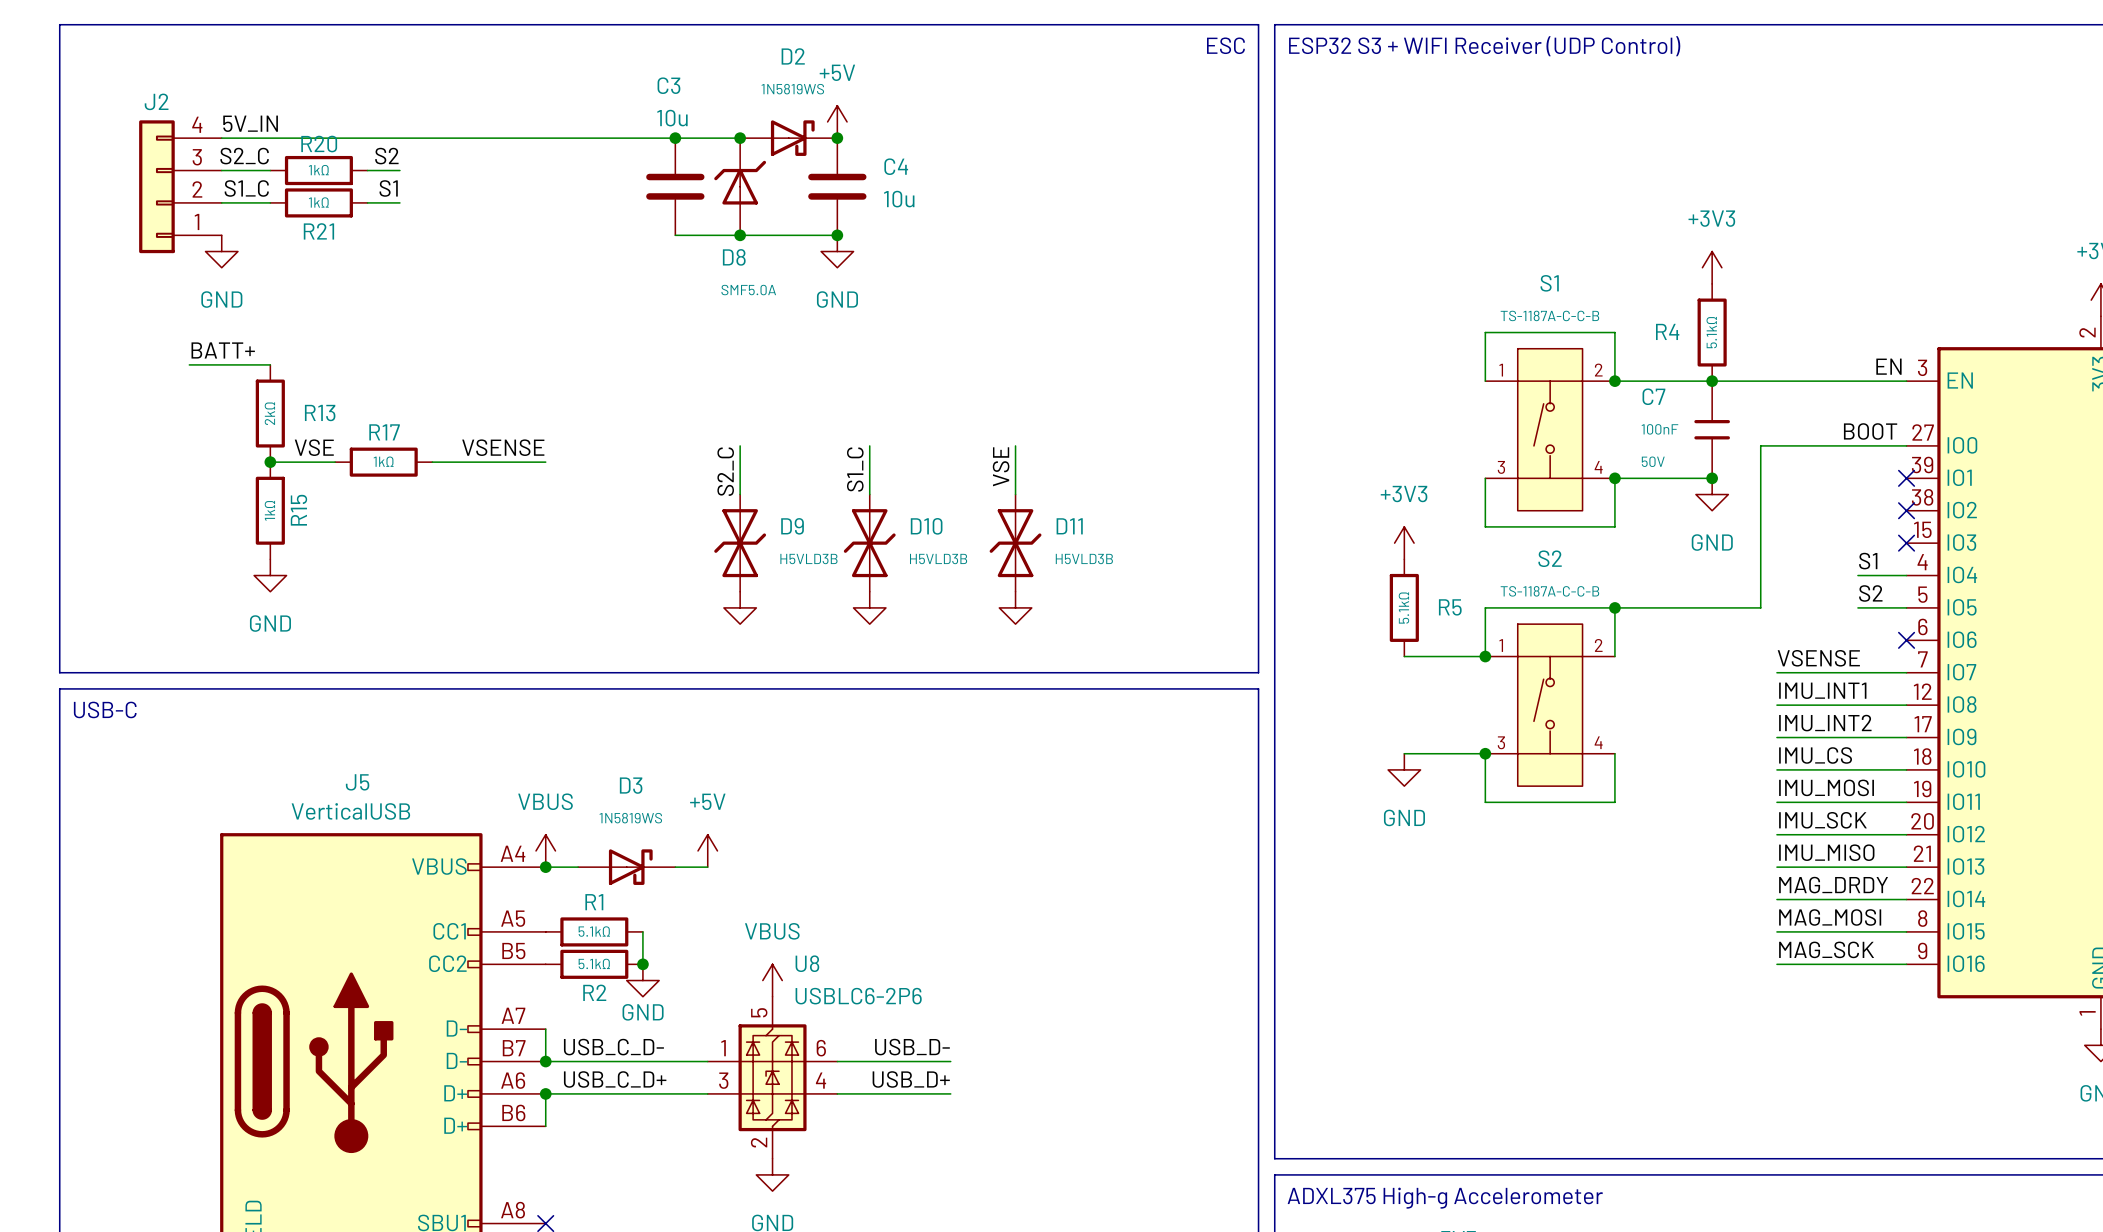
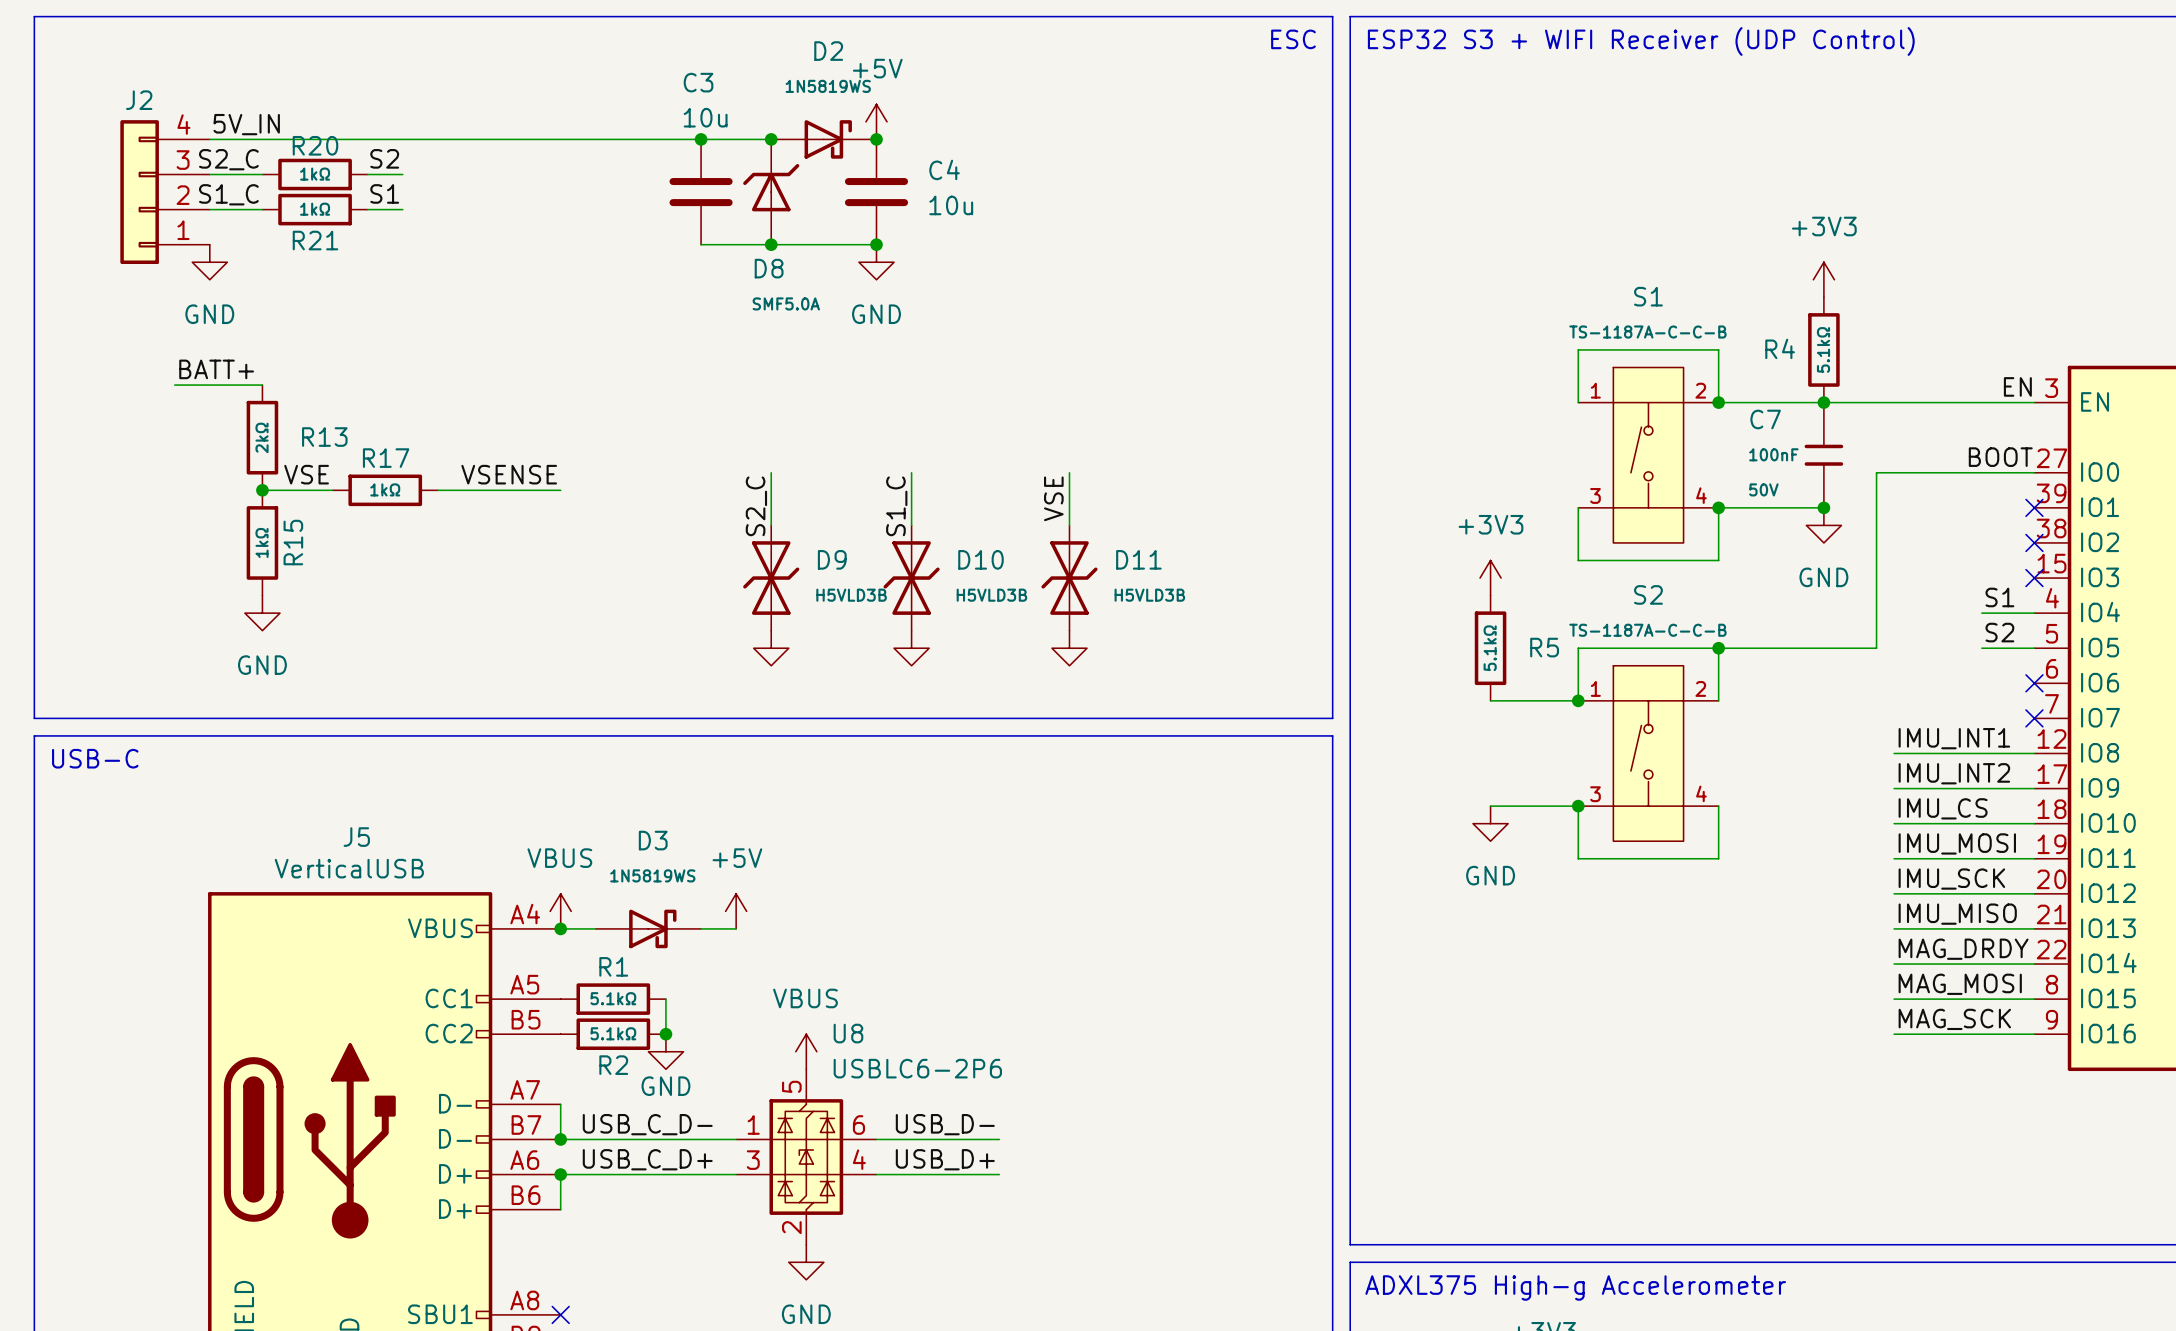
label: VSENSE (1818, 658) -> none
wire: (1776, 672) (1906, 672) -> none
no-connect mark: none -> (2034, 718)

